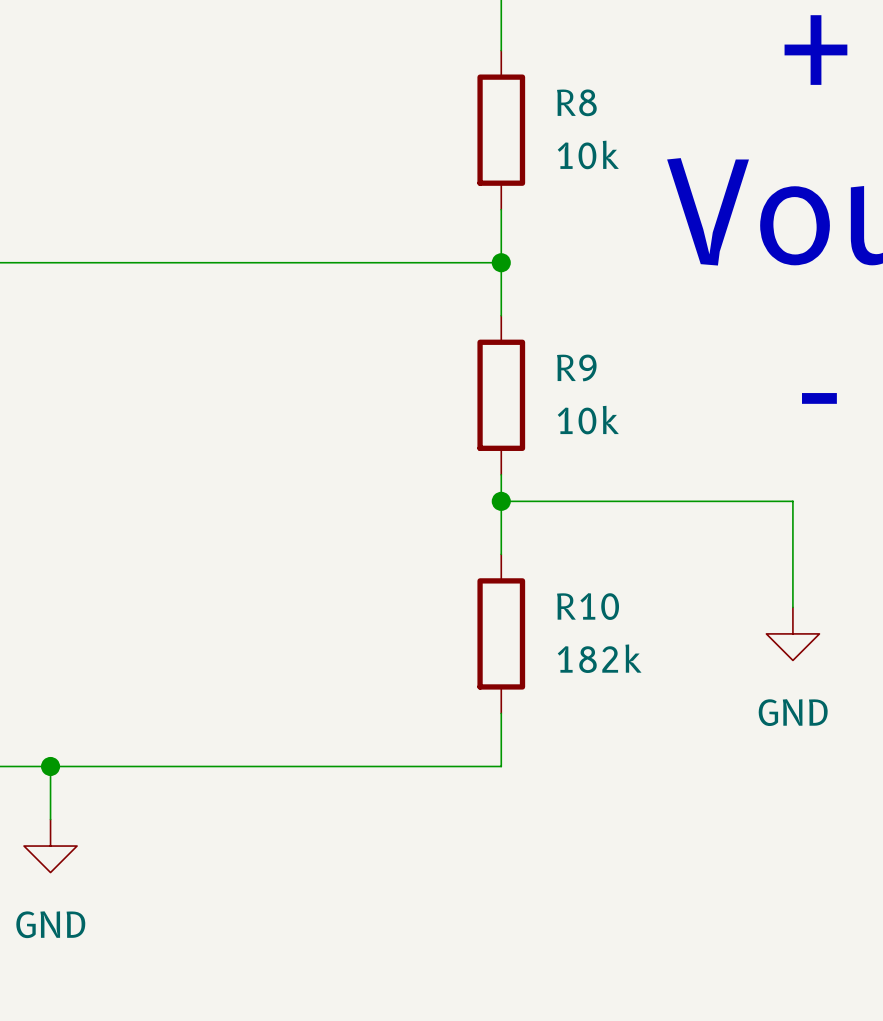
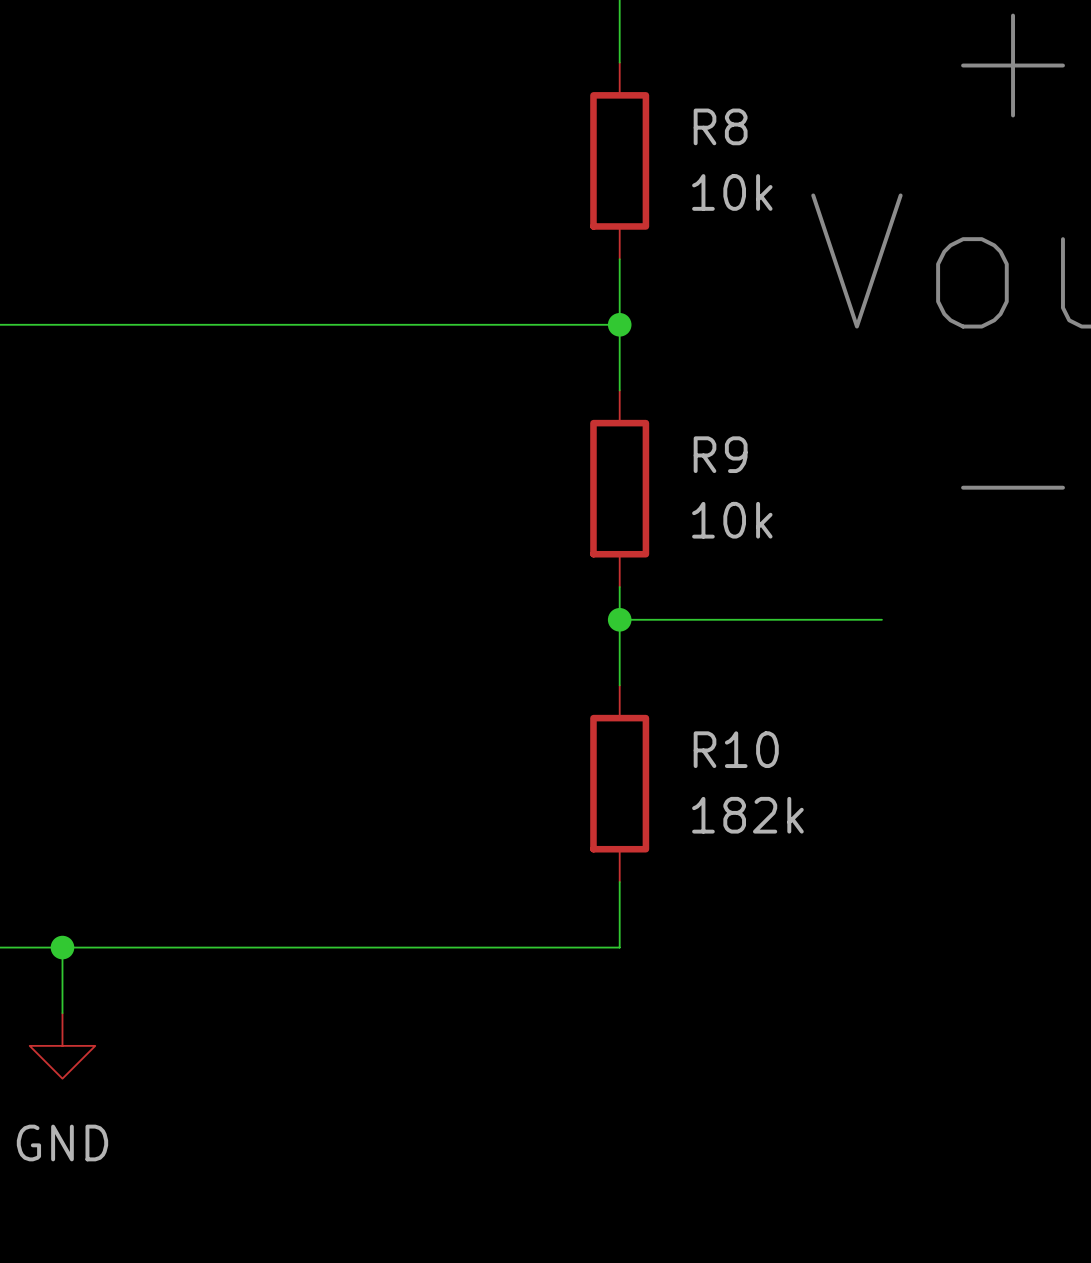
wire: (713, 501) (792, 501) (792, 607) -> none
power symbol: GND (792, 633) -> none

